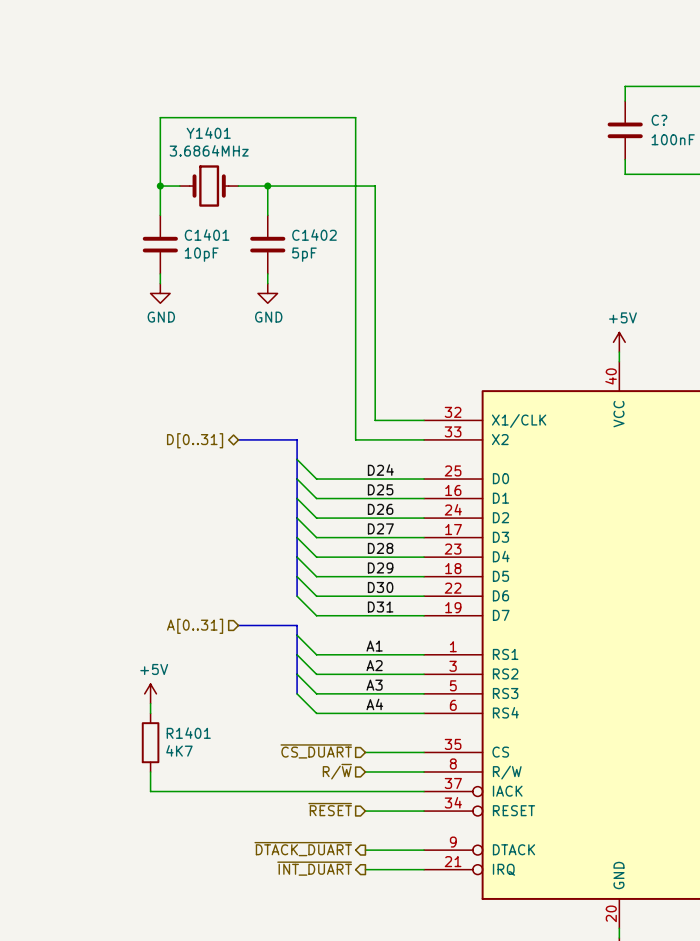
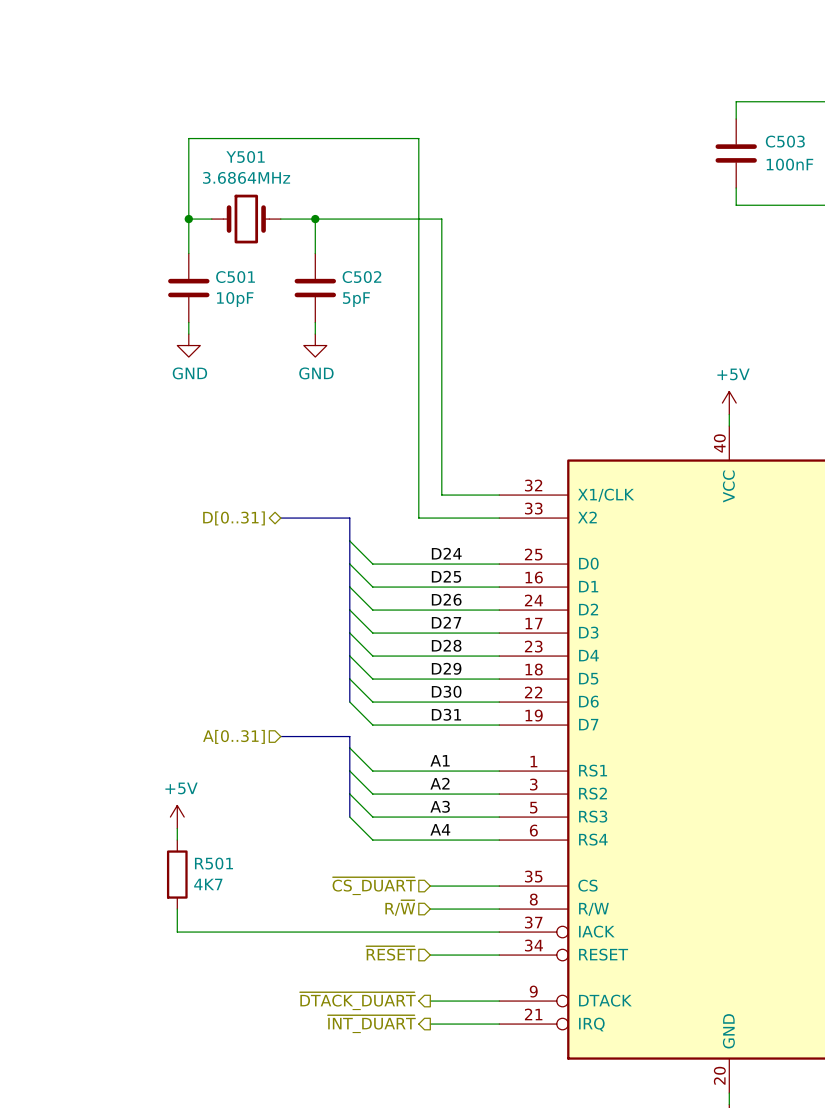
C? name: C? (659, 120) -> C503 (785, 141)
Y1401 name: Y1401 (208, 133) -> Y501 (245, 156)
C1401 name: C1401 (207, 235) -> C501 (235, 277)
C1402 name: C1402 (314, 235) -> C502 (361, 277)
R1401 name: R1401 (188, 733) -> R501 (213, 863)

